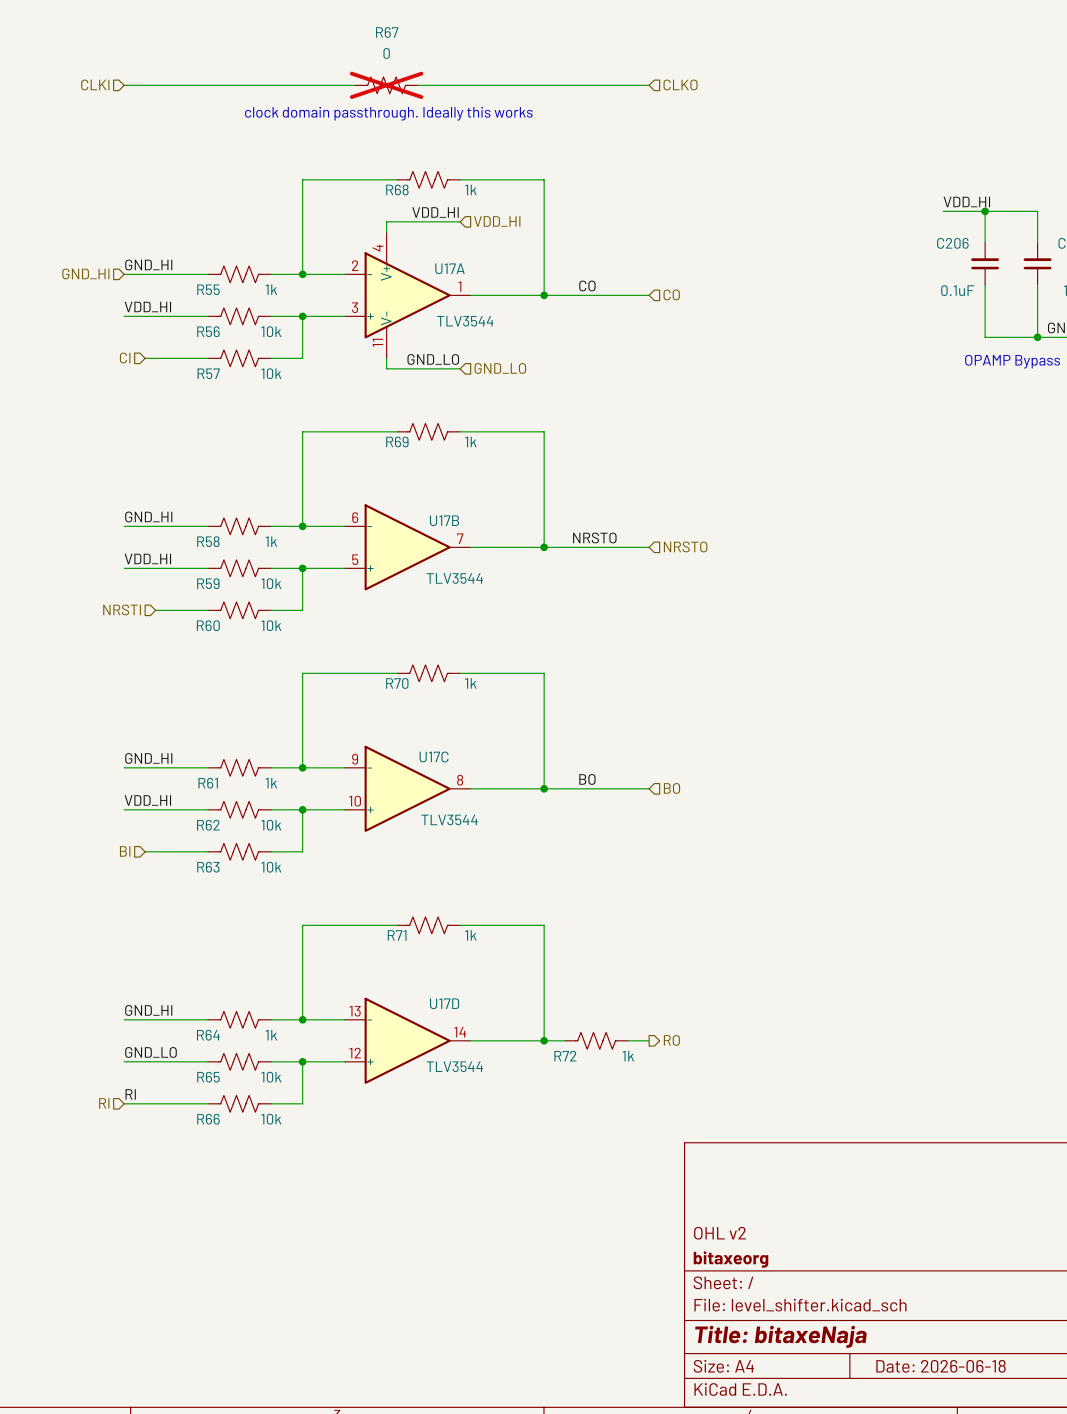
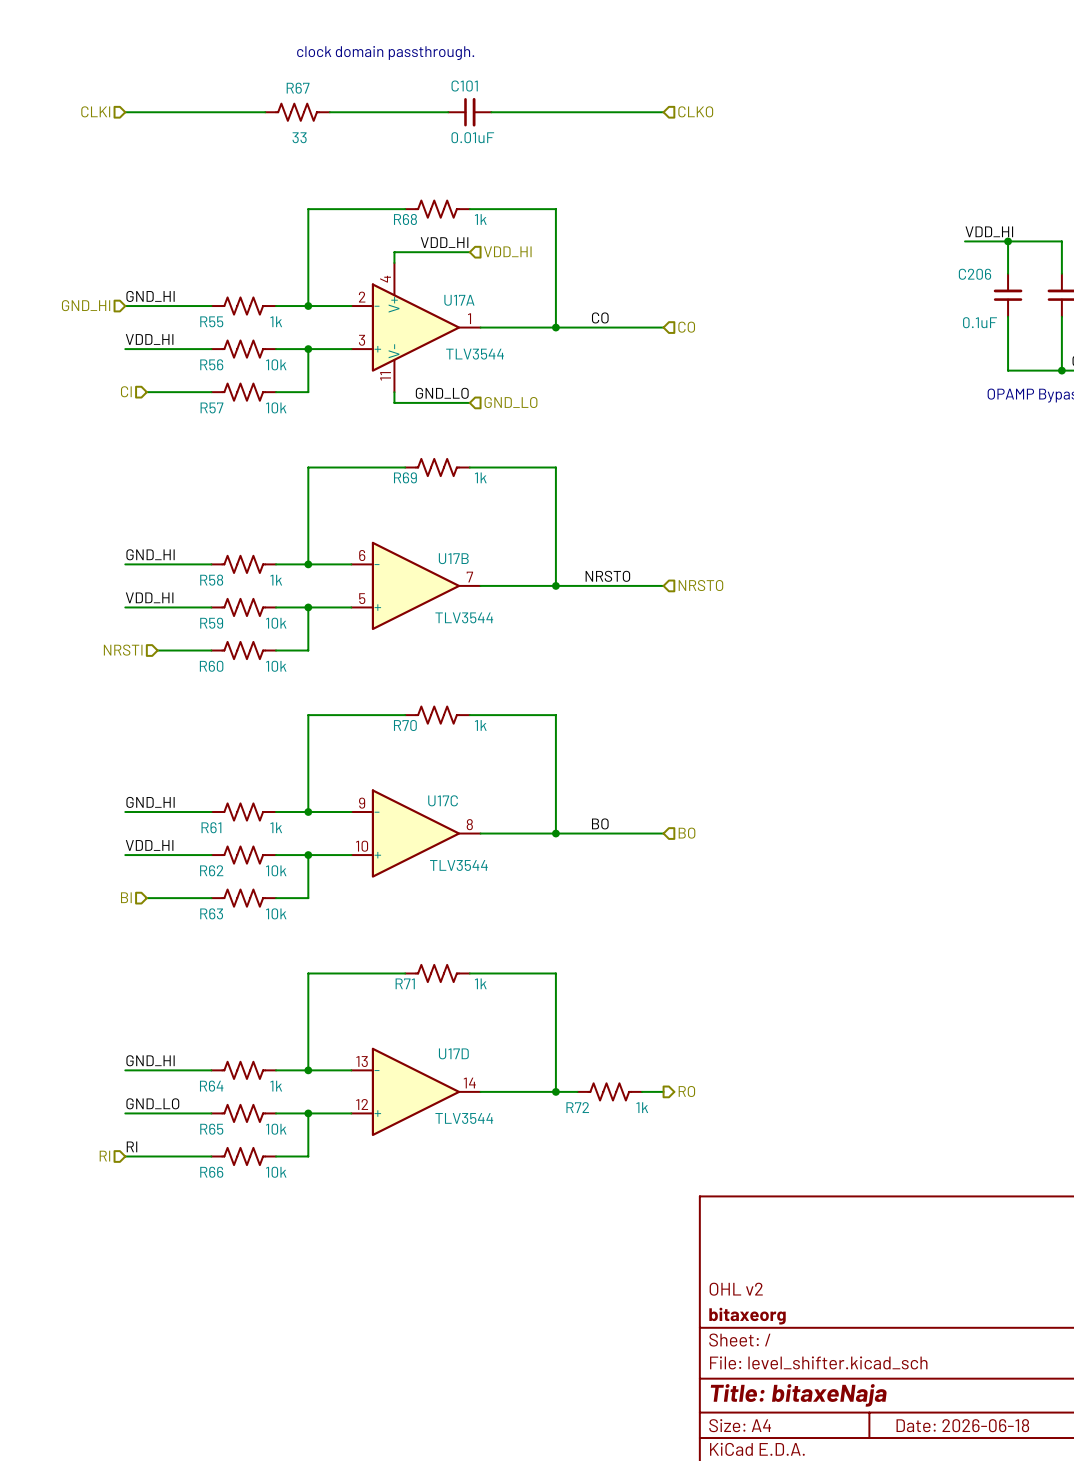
text: none -> clock domain passthrough. (385, 53)
R67 name position: R67 (387, 32) -> R67 (298, 88)
R67 value: 0 (386, 53) -> 33 (299, 137)
R67 position: (386, 85) -> (297, 112)
R67 do-not-place cross: (386, 85) -> none
C101: none -> 0.01uF (469, 112)
text: clock domain passthrough. Ideally this works (388, 113) -> none

